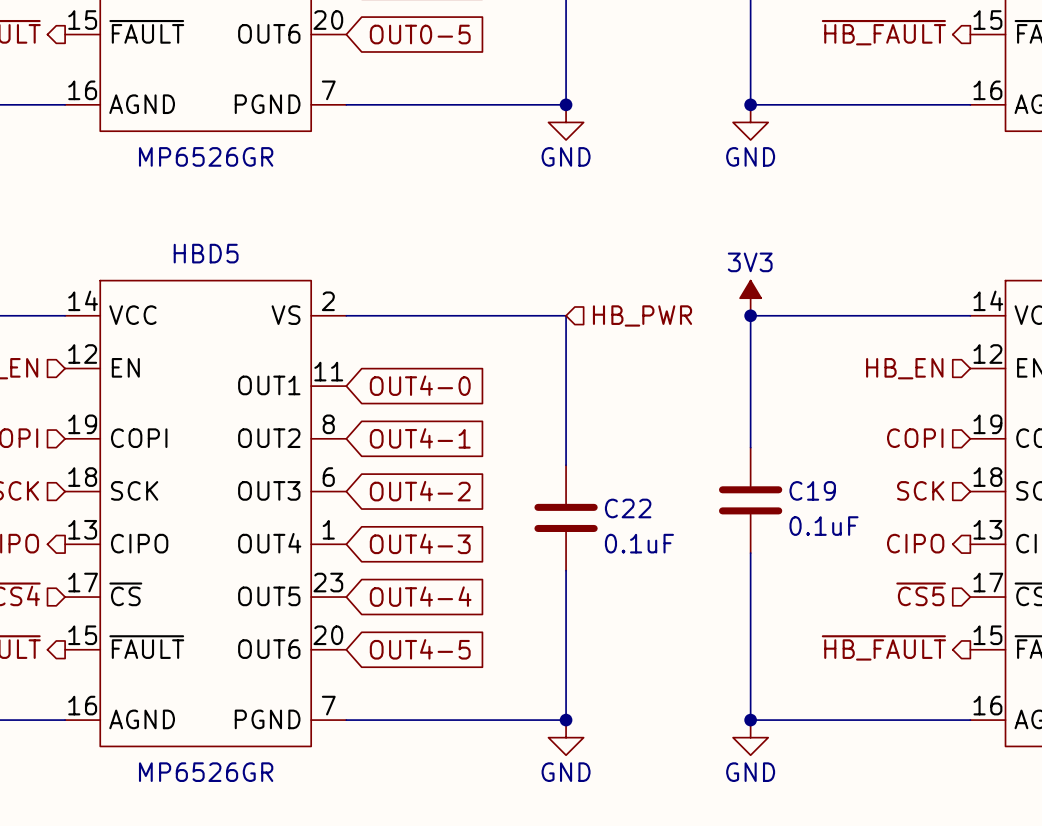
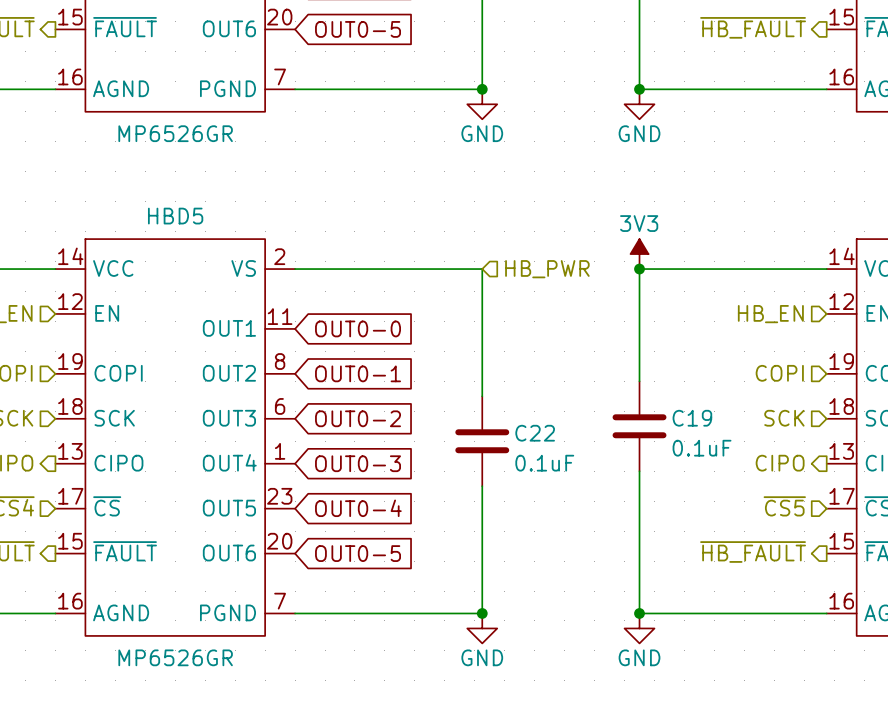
global label: OUT4-0 (420, 385) -> OUT0-0 (358, 328)
global label: OUT4-1 (420, 438) -> OUT0-1 (358, 373)
global label: OUT4-2 (420, 491) -> OUT0-2 (358, 418)
global label: OUT4-3 (420, 543) -> OUT0-3 (358, 463)
global label: OUT4-4 (420, 596) -> OUT0-4 (358, 508)
global label: OUT4-5 (420, 649) -> OUT0-5 (358, 553)

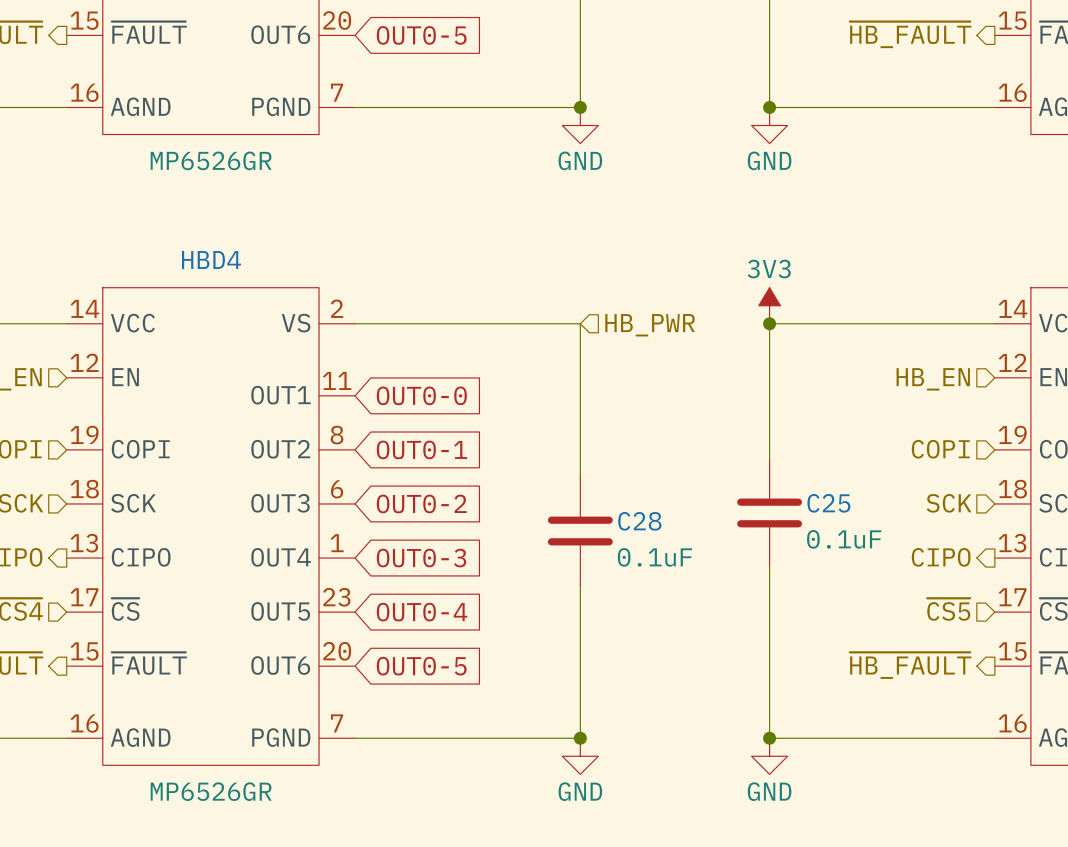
HBD5 name: HBD5 (175, 216) -> HBD4 (211, 260)
C19 name: C19 (692, 418) -> C25 (828, 503)
C22 name: C22 (535, 433) -> C28 (639, 521)

